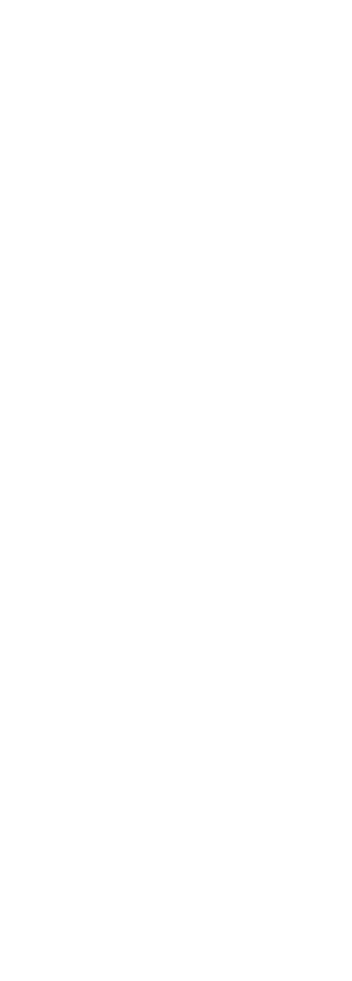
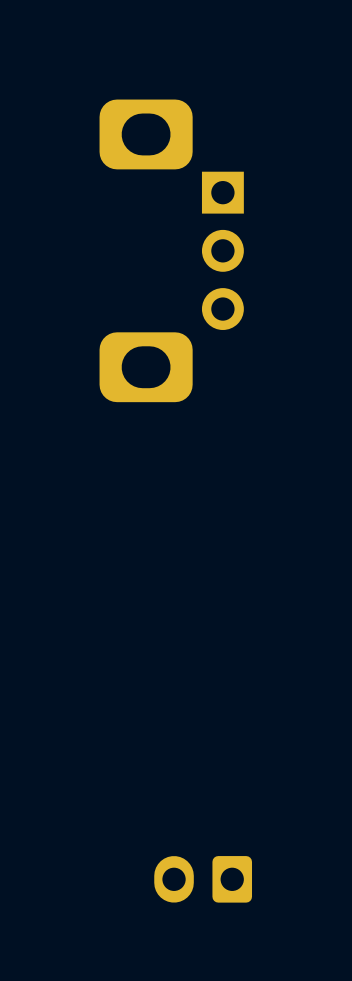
part: none -> (171, 250)
part: none -> (203, 879)

